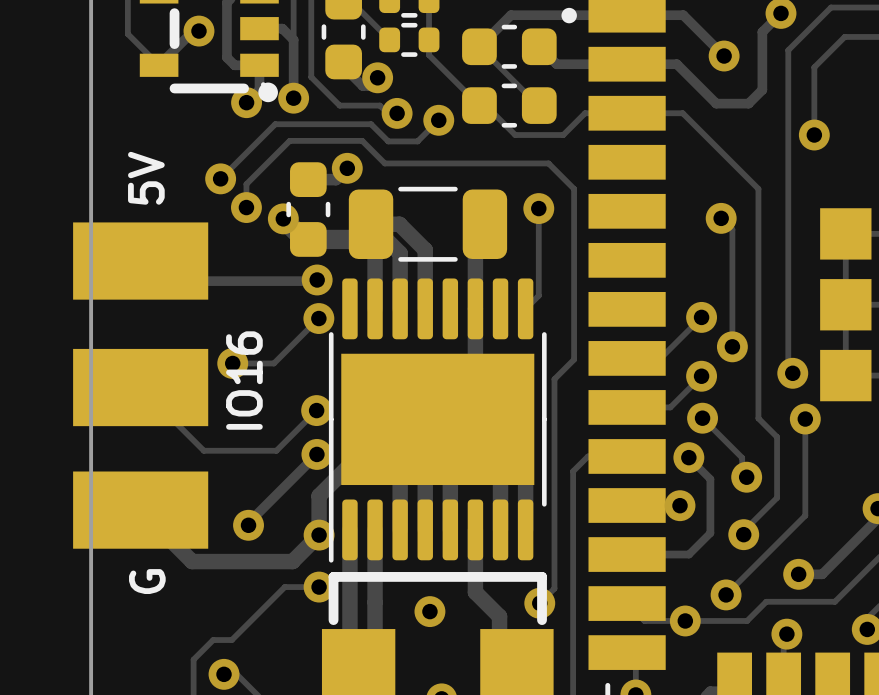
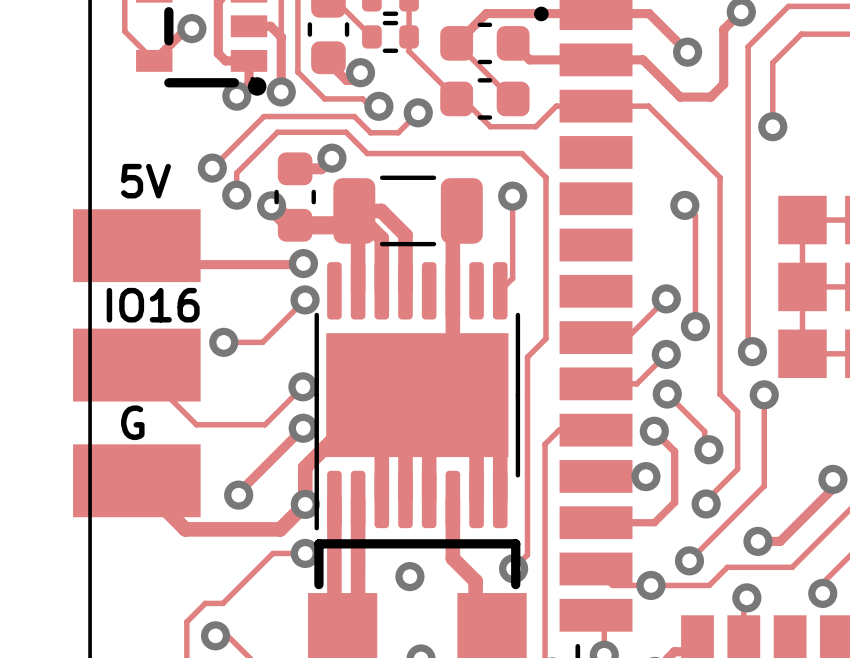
text rotation: 0° (146, 178) -> 90° clockwise (145, 181)
text rotation: 0° (244, 380) -> 90° clockwise (153, 305)
text rotation: 0° (147, 581) -> 90° clockwise (132, 422)
text position: G (147, 581) -> G (132, 422)

